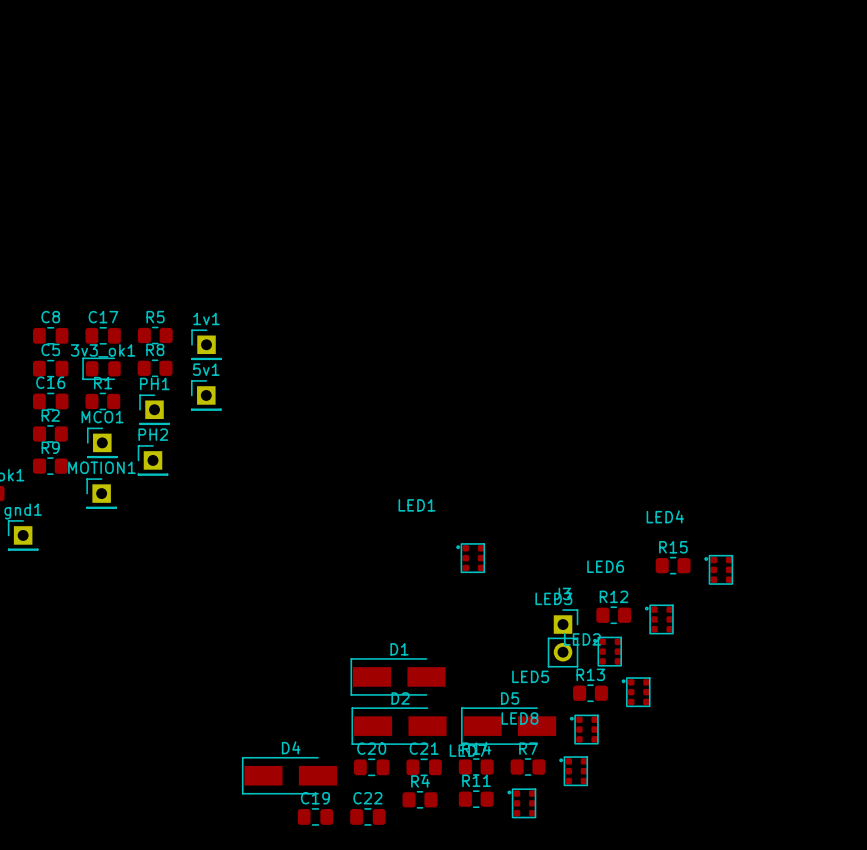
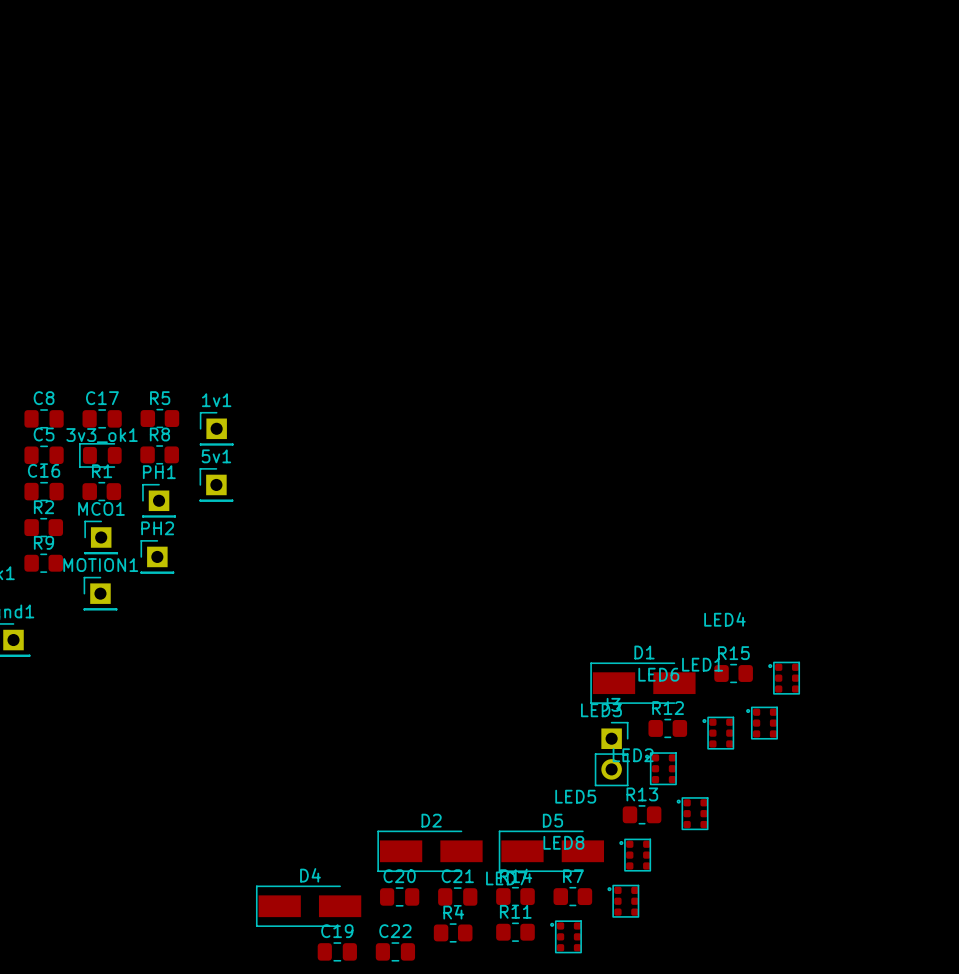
LED1 position: (470, 558) -> (762, 723)
D1 position: (398, 676) -> (642, 683)

